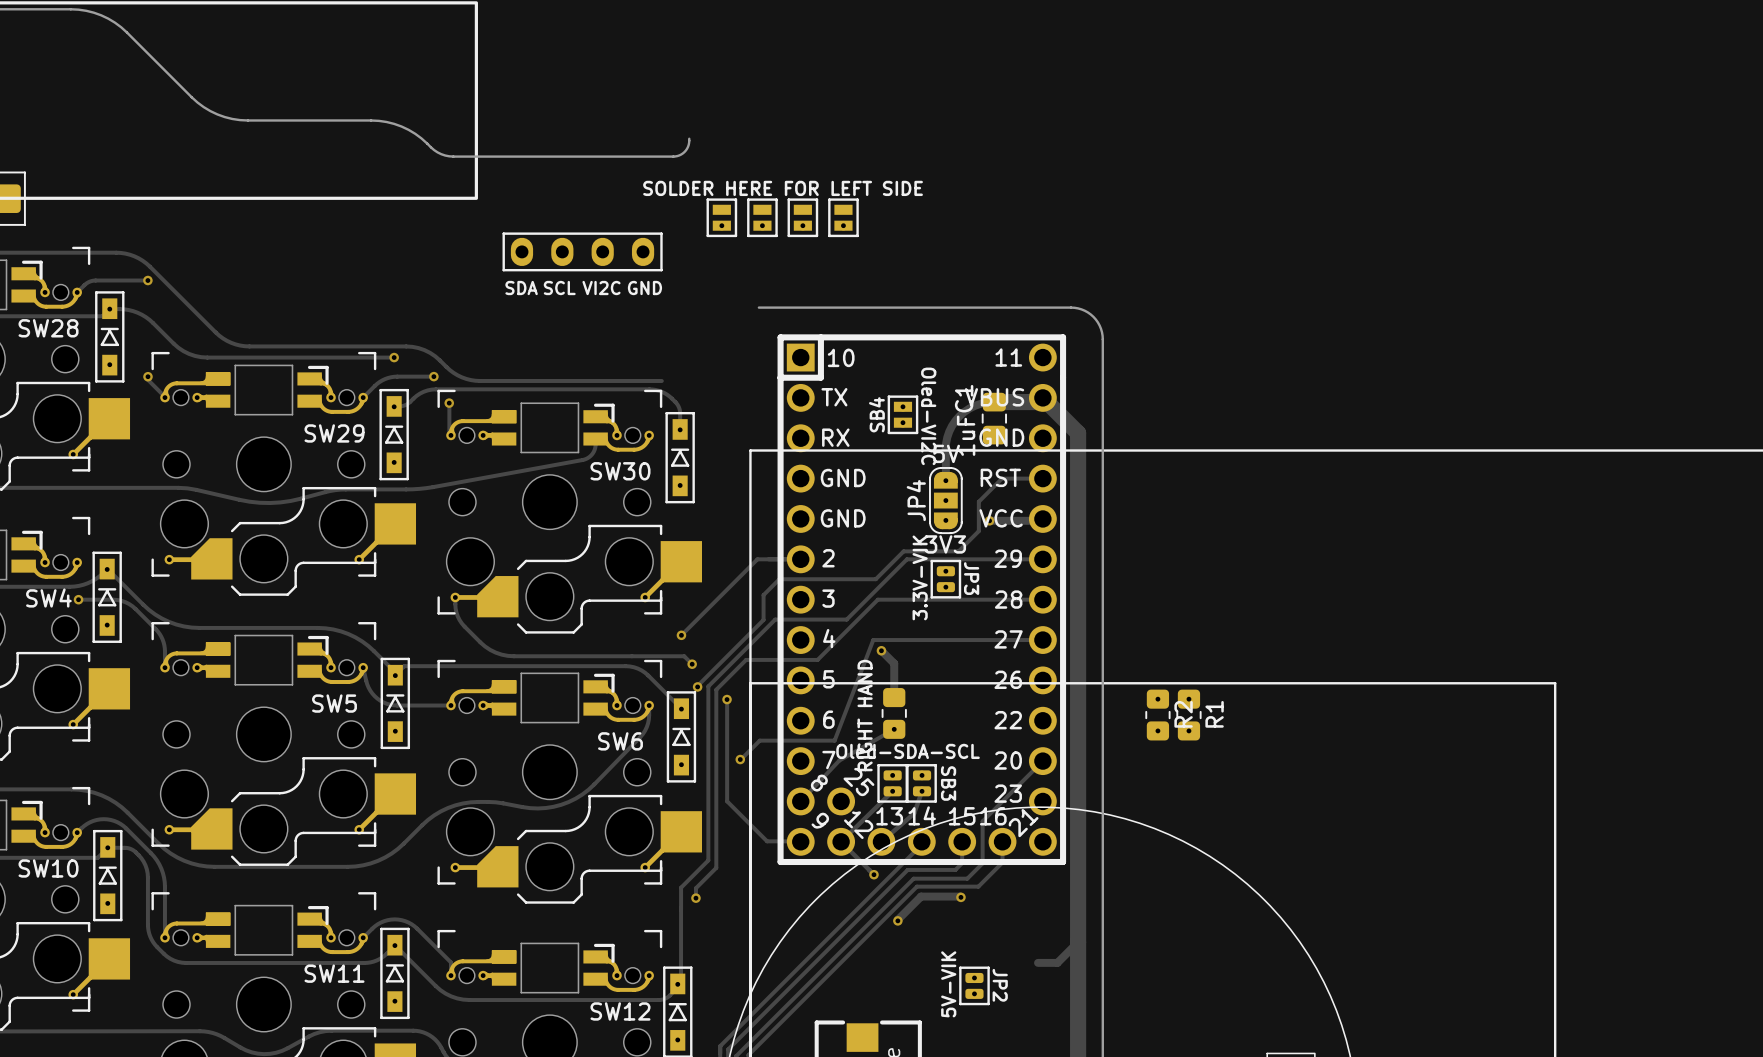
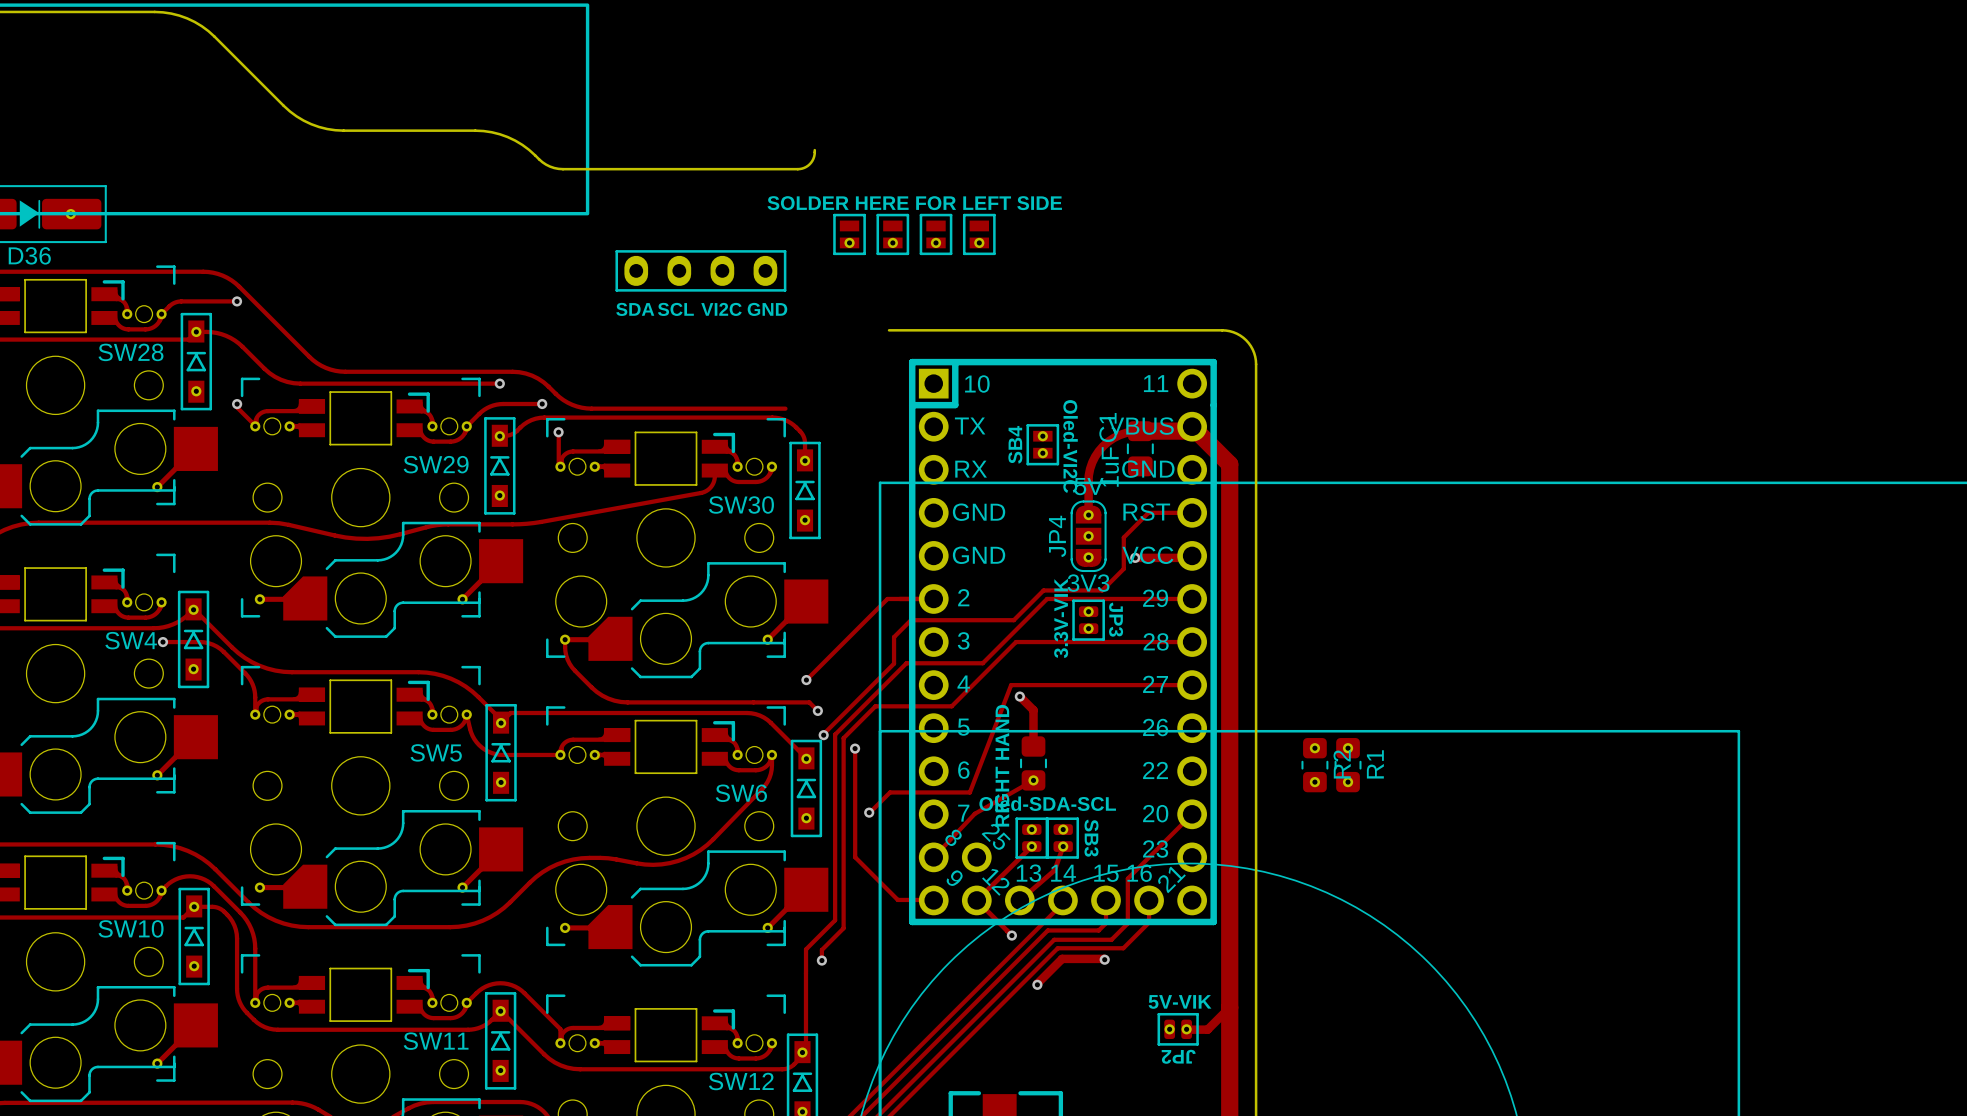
JP2 rotation: 0° (974, 985) -> 90° clockwise (1178, 1029)
JP2 position: (974, 985) -> (1178, 1029)

